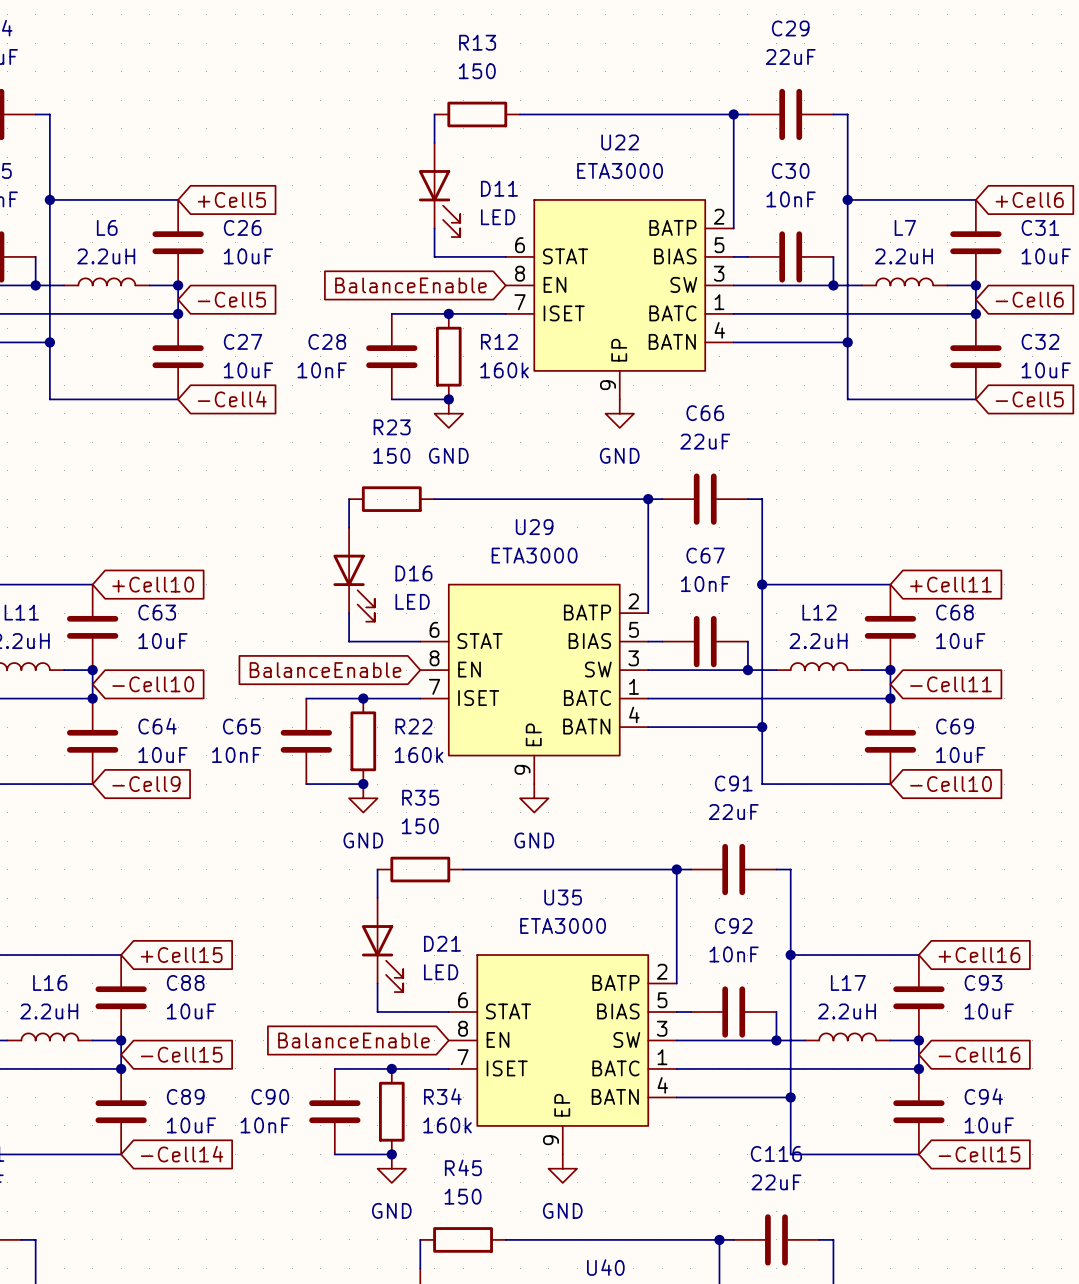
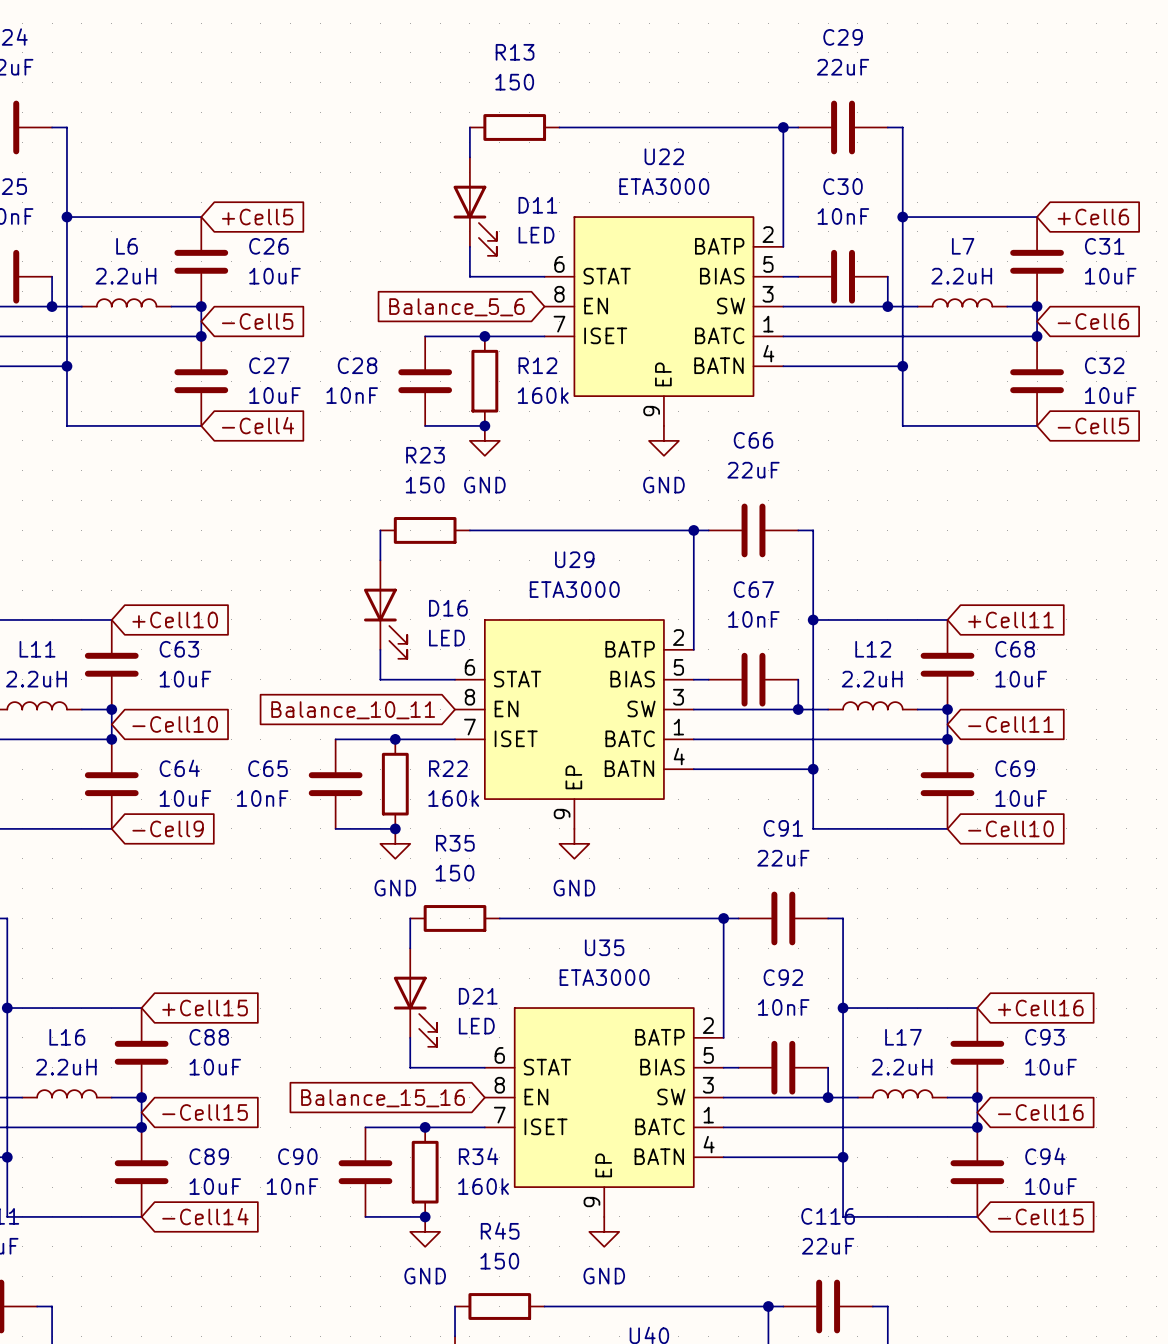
global label: BalanceEnable (410, 285) -> Balance_5_6 (456, 307)
global label: BalanceEnable (325, 670) -> Balance_10_11 (353, 710)
global label: BalanceEnable (353, 1040) -> Balance_15_16 (383, 1098)

